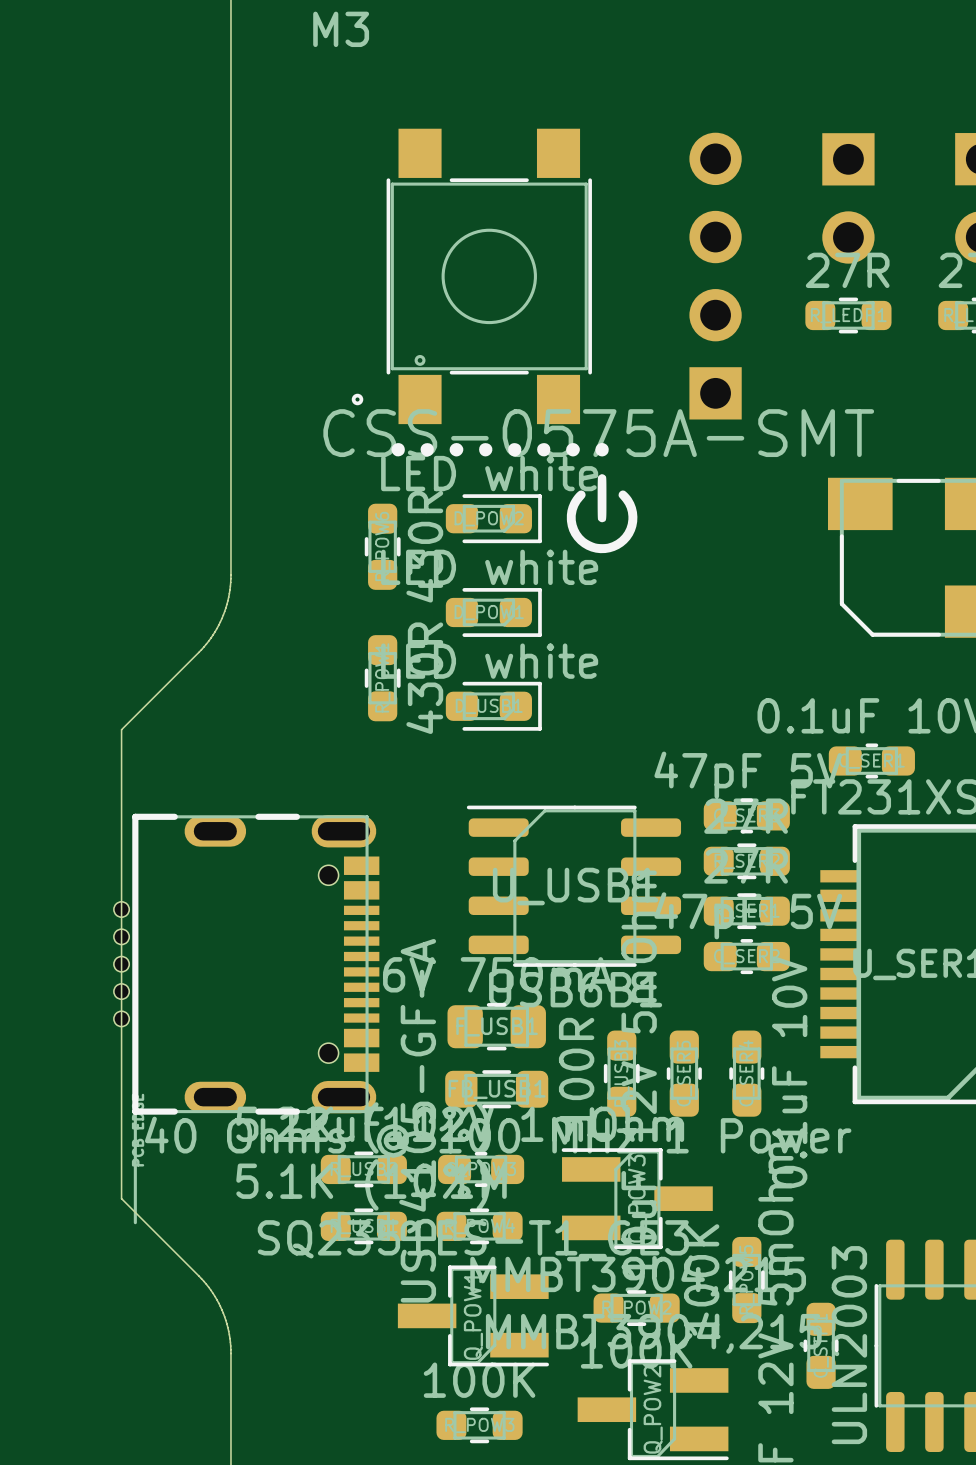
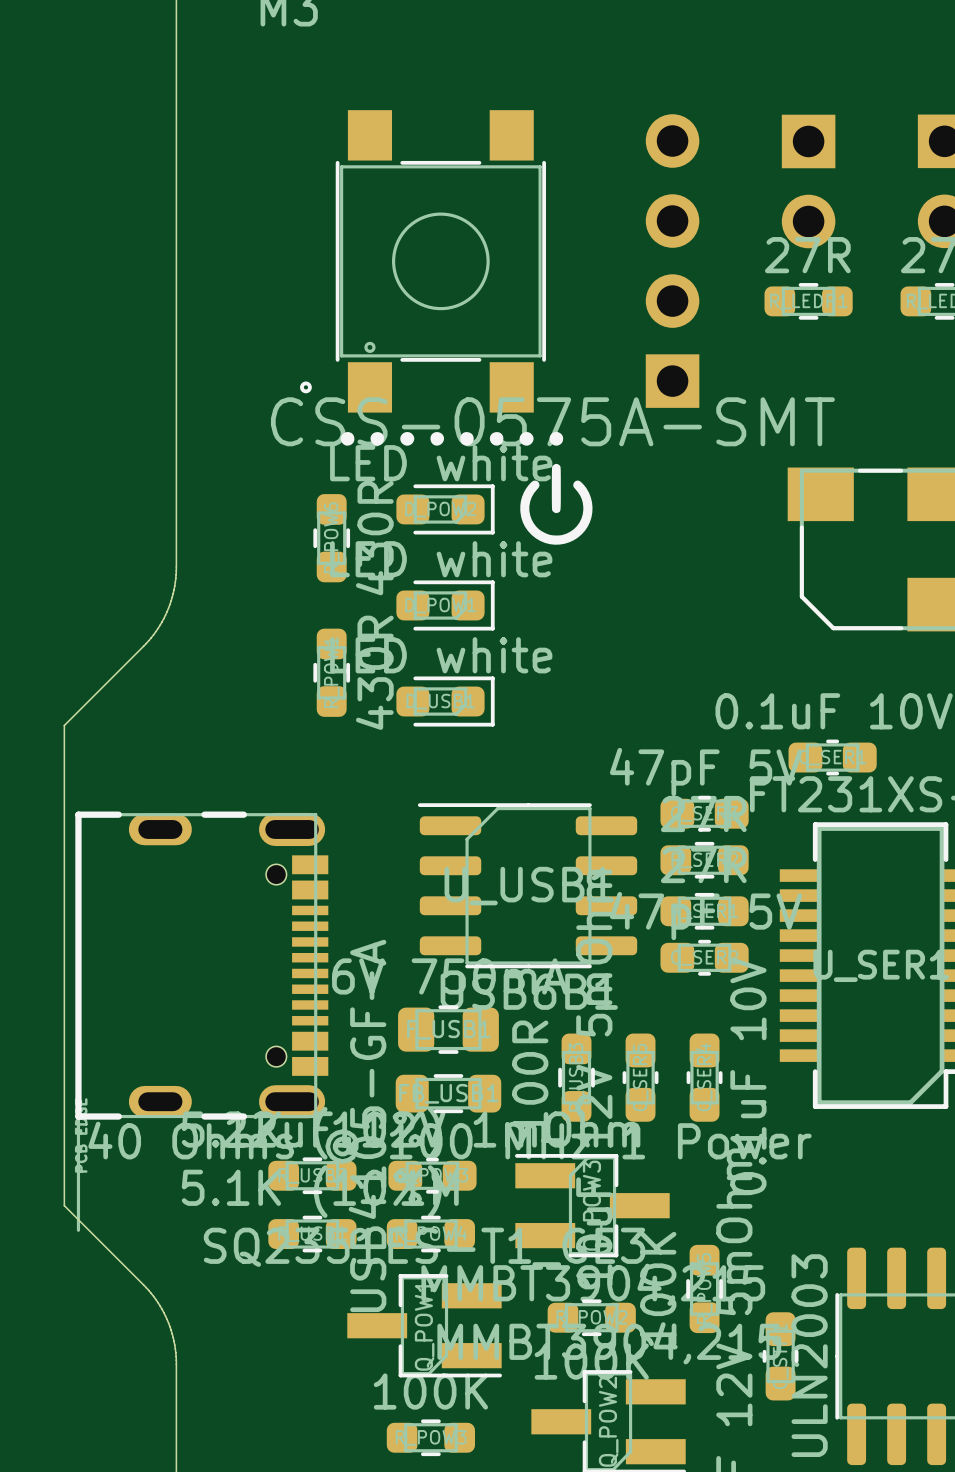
part: (121, 909) -> none
part: (121, 936) -> none
part: (121, 964) -> none
part: (121, 991) -> none
part: (121, 1018) -> none

